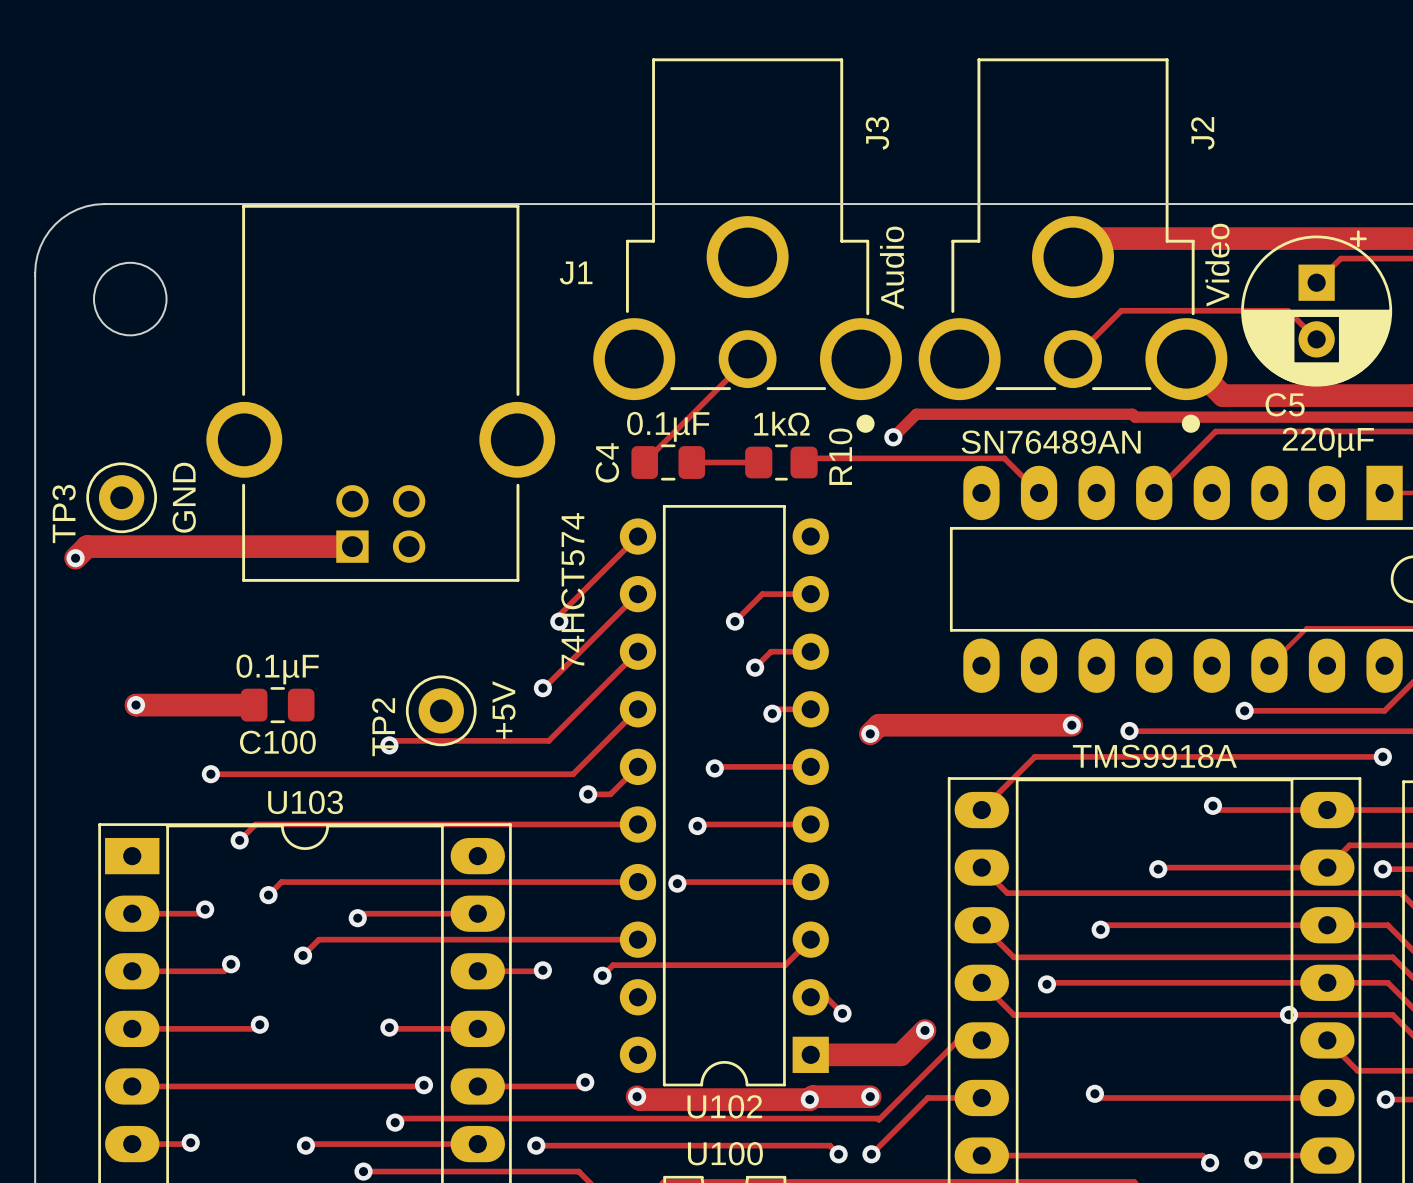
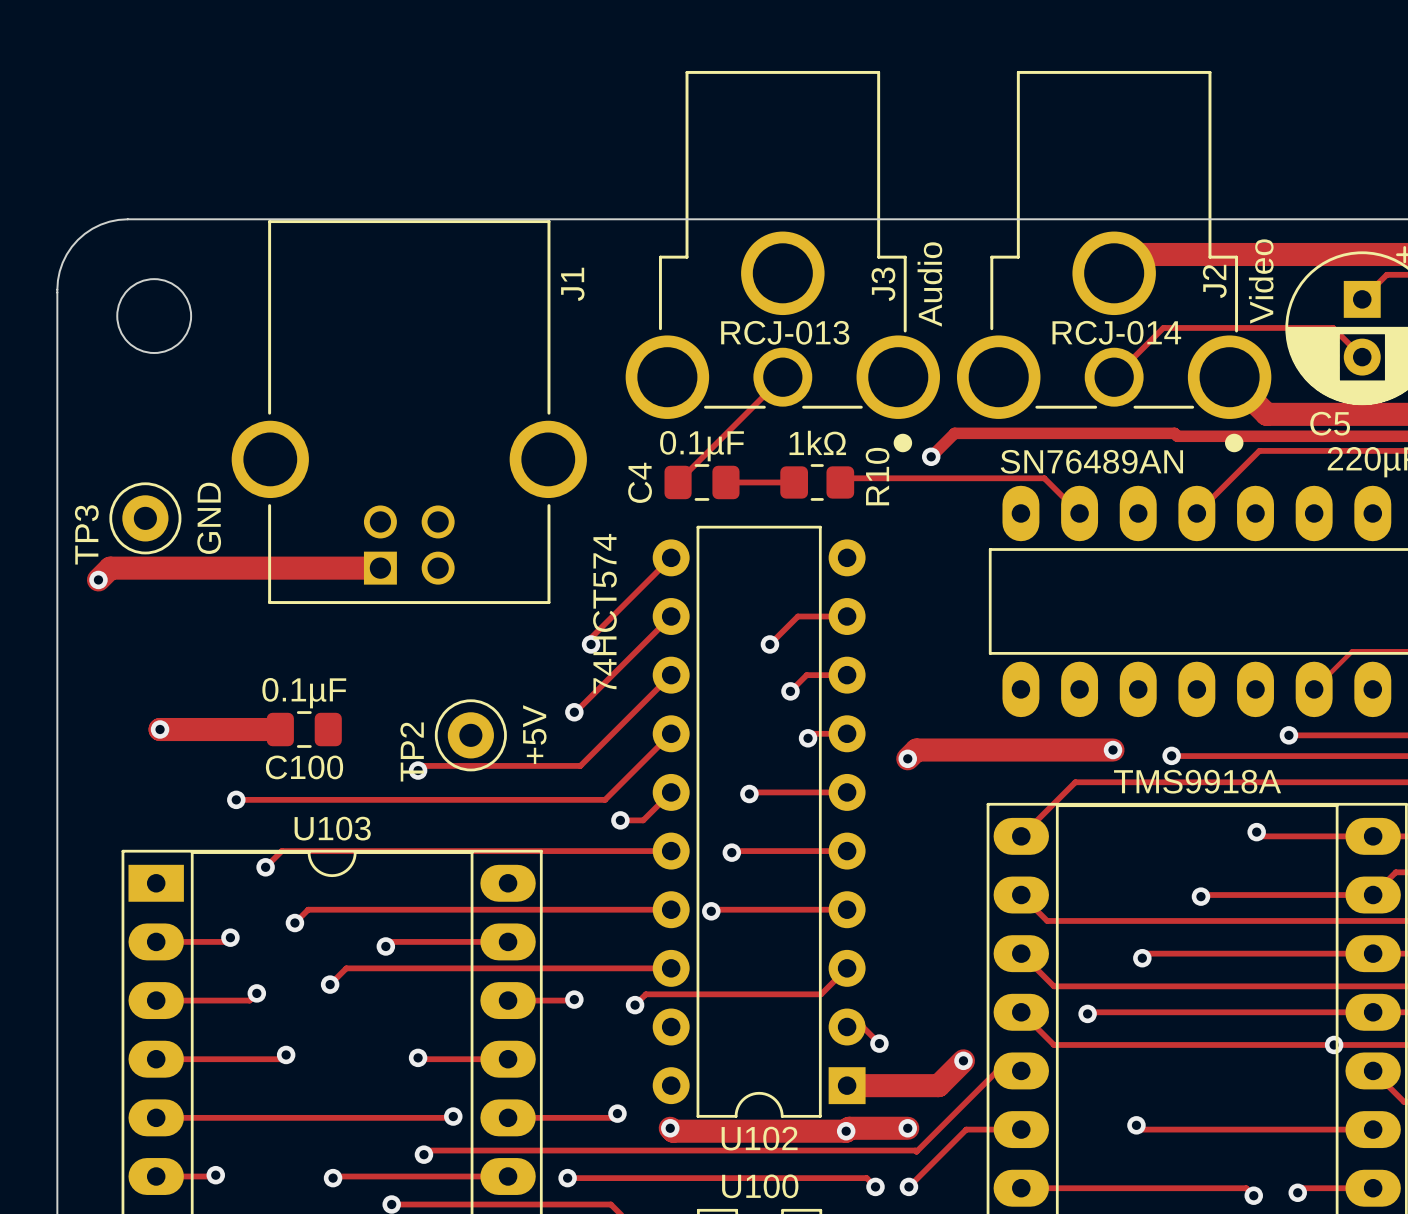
J3 name position: J3 (877, 133) -> J3 (883, 284)
J2 name position: J2 (1202, 133) -> J2 (1214, 281)
J1 name rotation: 0° (576, 272) -> 90° counterclockwise (572, 284)
J3 value: none -> RCJ-013 (785, 332)
J2 value: none -> RCJ-014 (1116, 332)

